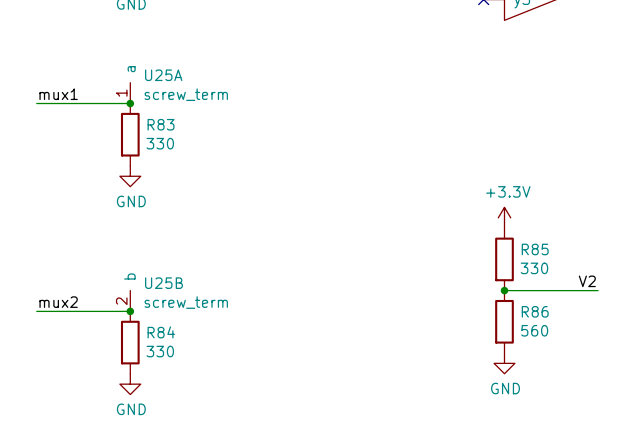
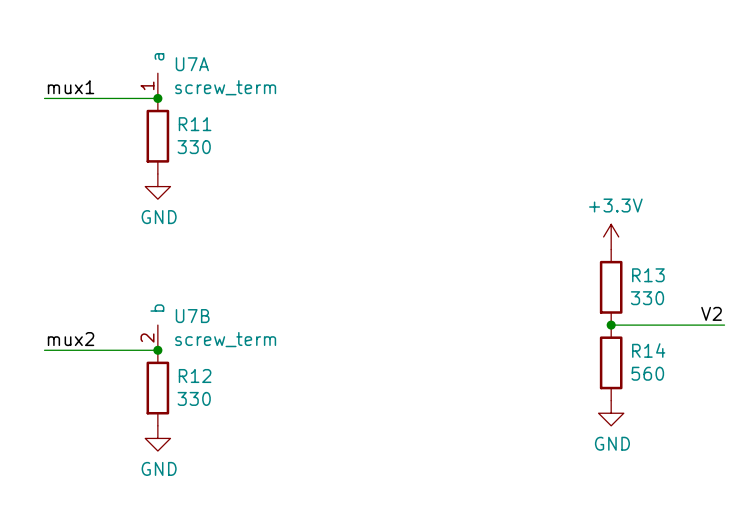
U25A name: U25A (163, 75) -> U7A (192, 64)
R83 name: R83 (161, 124) -> R11 (195, 124)
R85 name: R85 (535, 249) -> R13 (648, 275)
U25B name: U25B (163, 283) -> U7B (192, 316)
R86 name: R86 (535, 311) -> R14 (648, 350)
R84 name: R84 (161, 332) -> R12 (195, 376)

